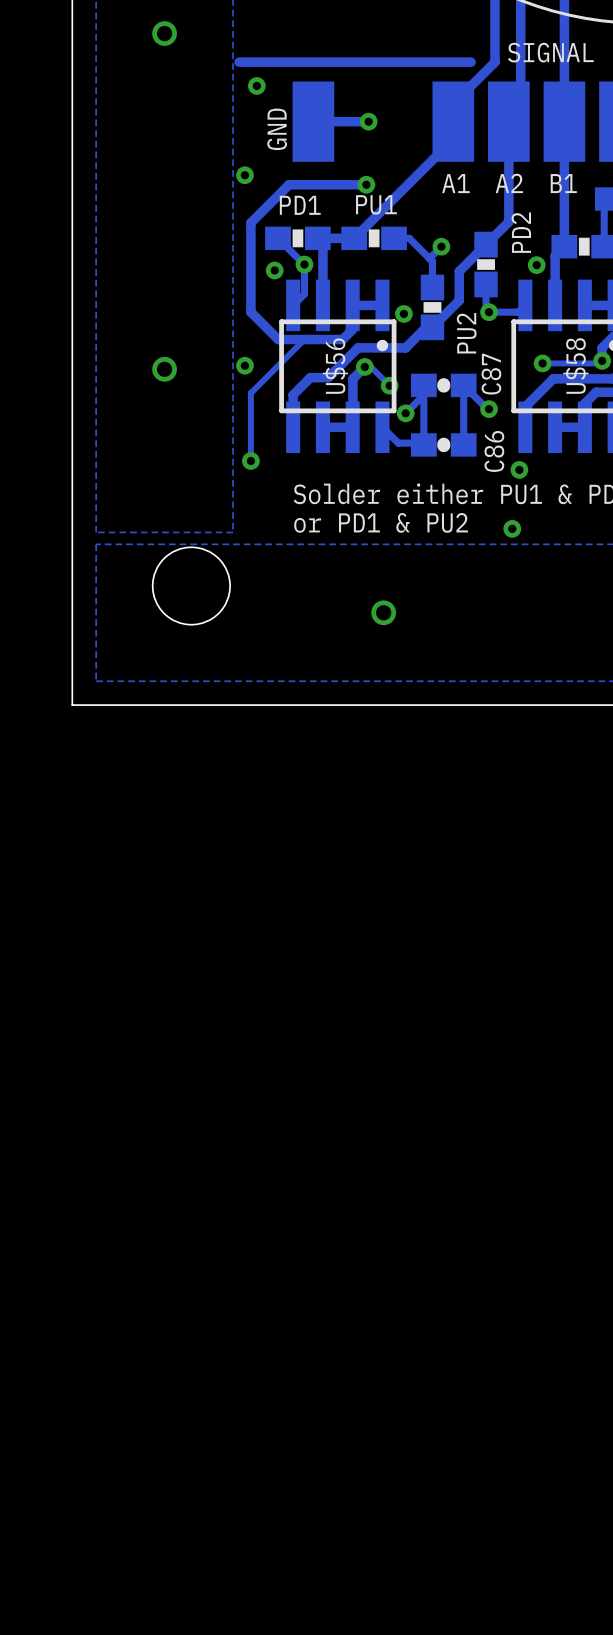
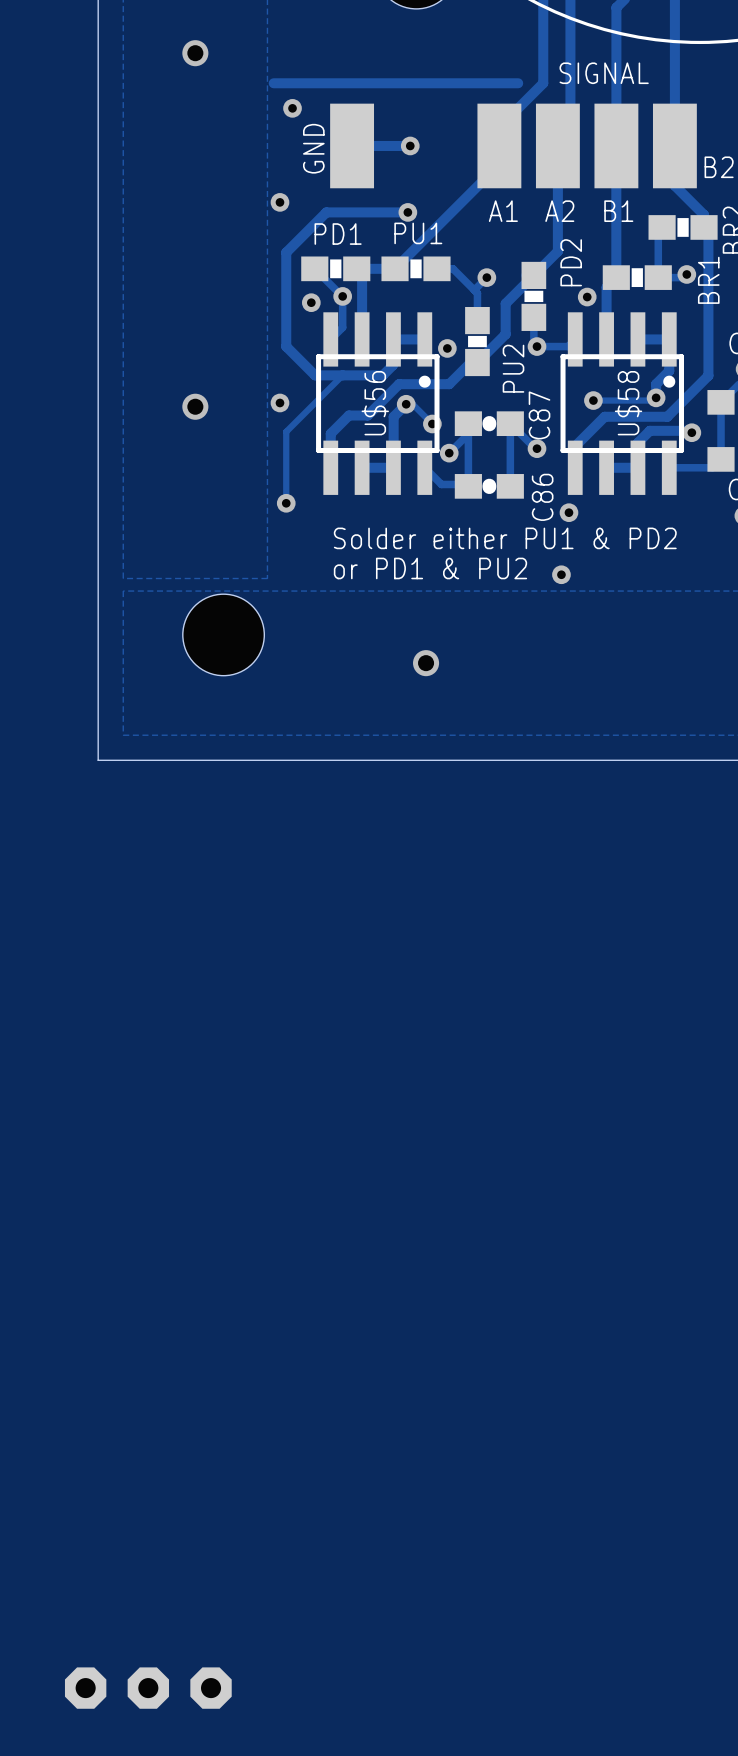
part: none -> (148, 1688)

